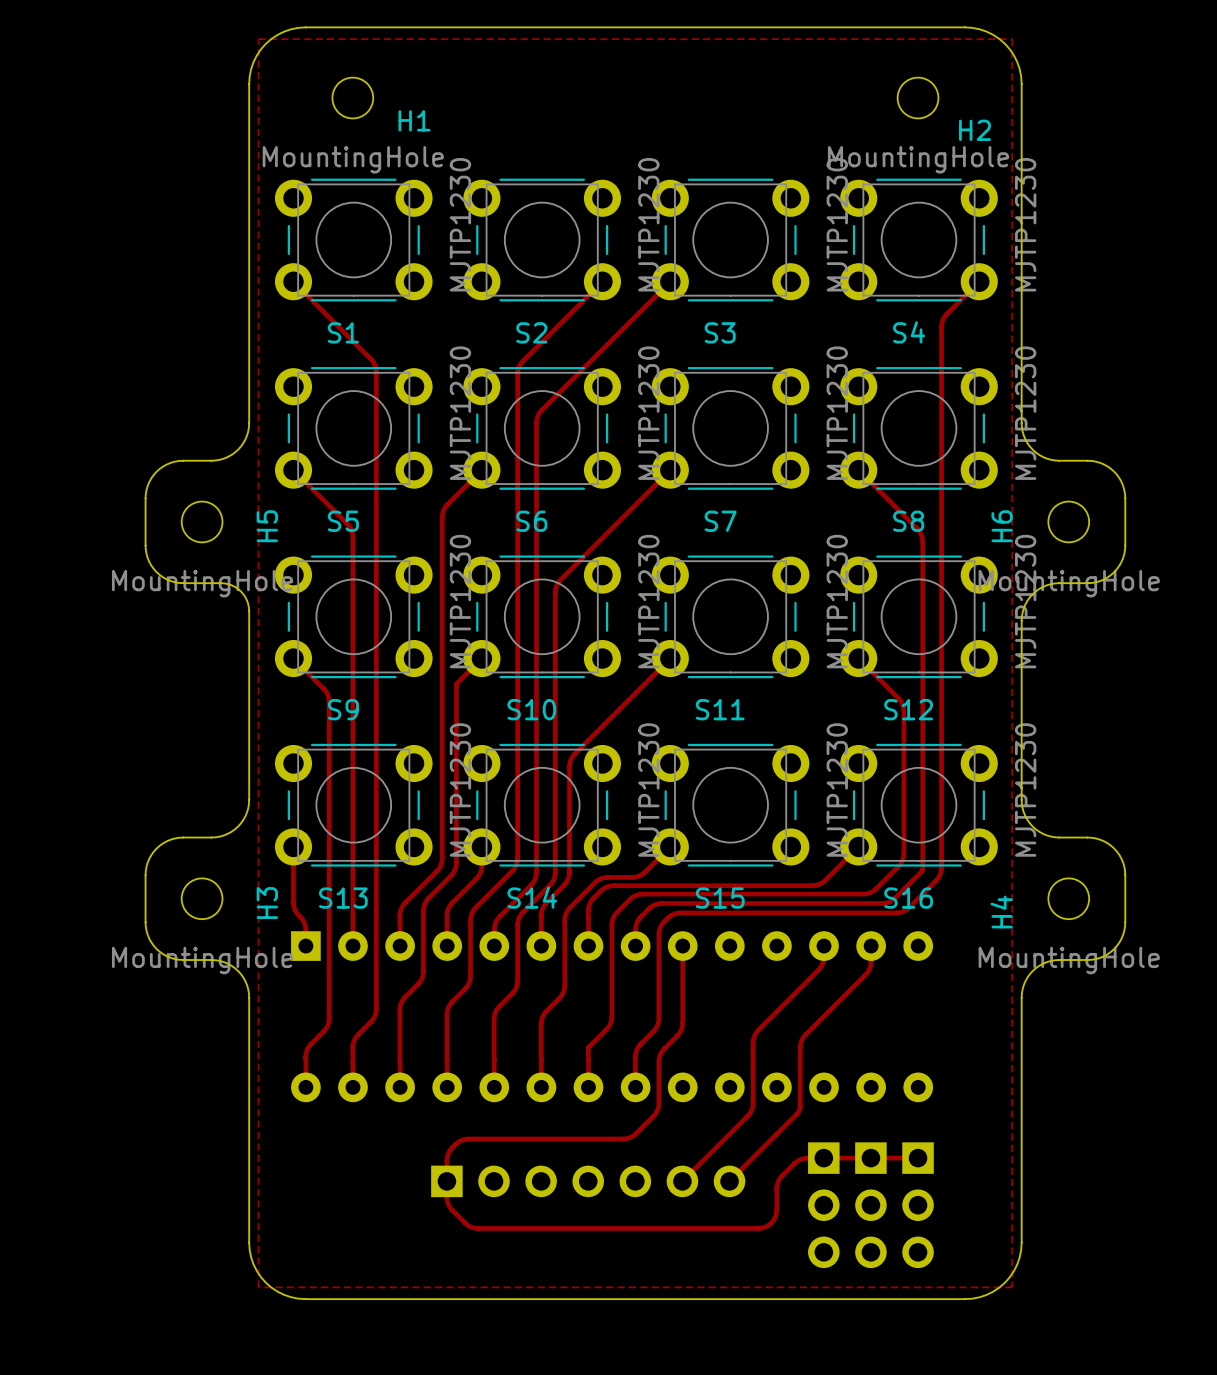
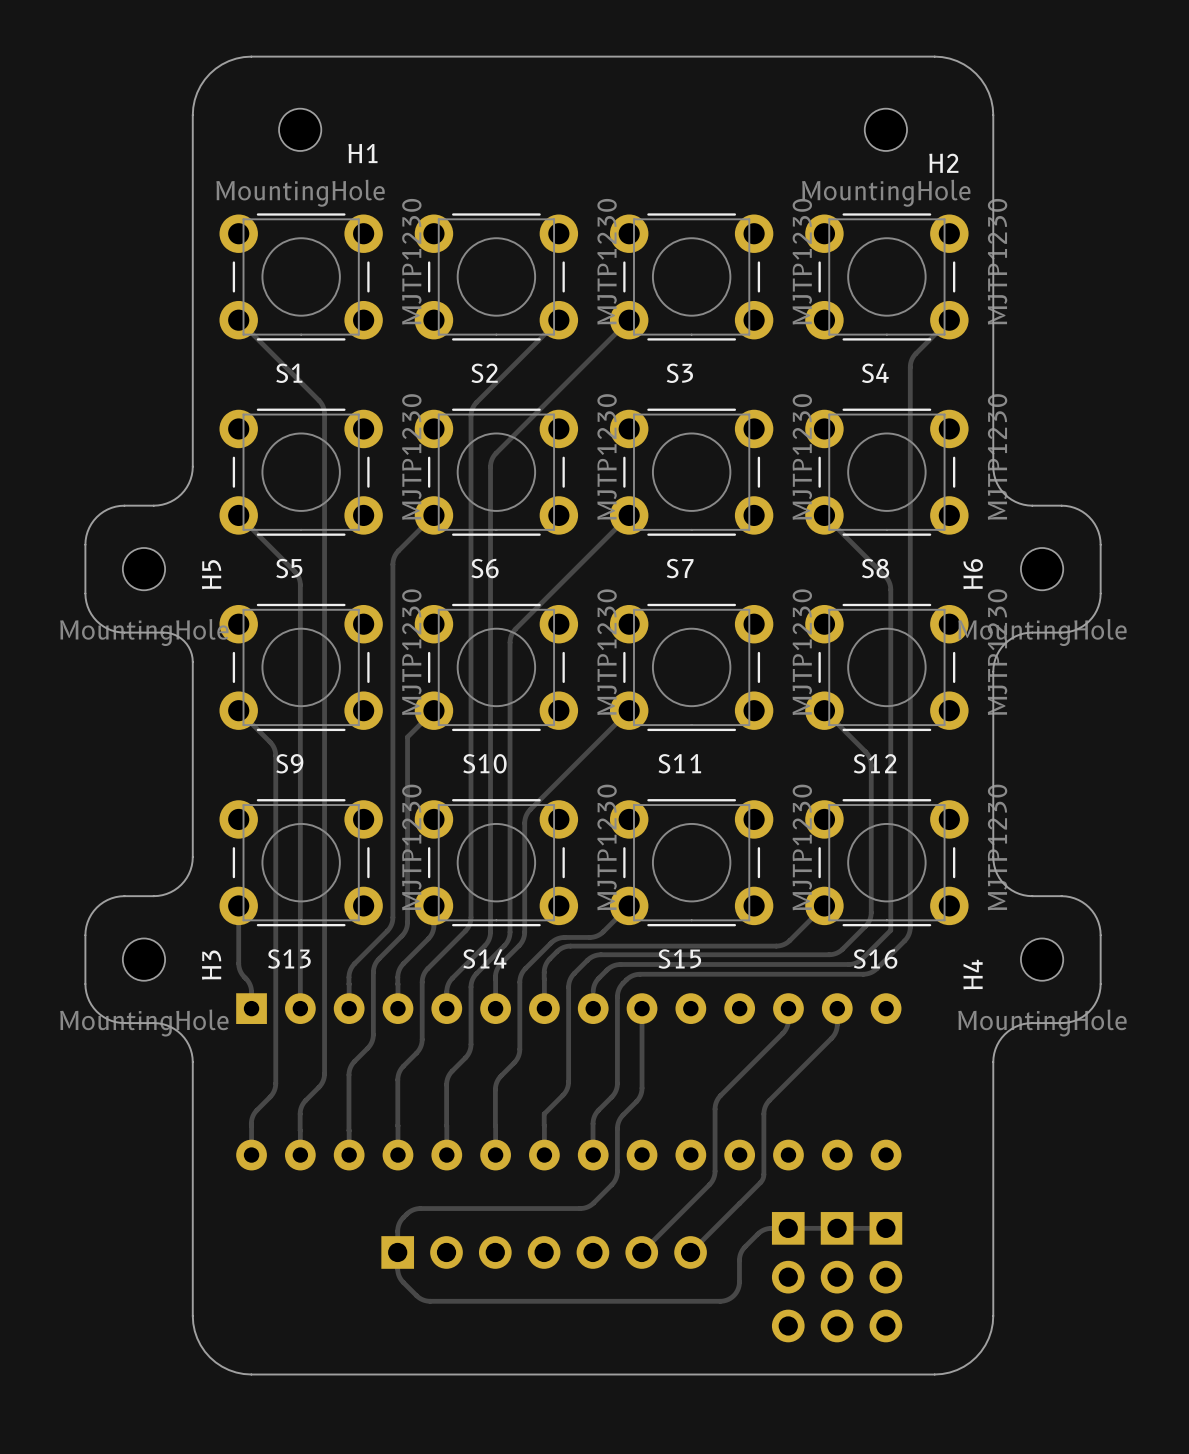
zone outline: (258, 39) (258, 1287) (1012, 1287) (1012, 39) (258, 39) -> none

